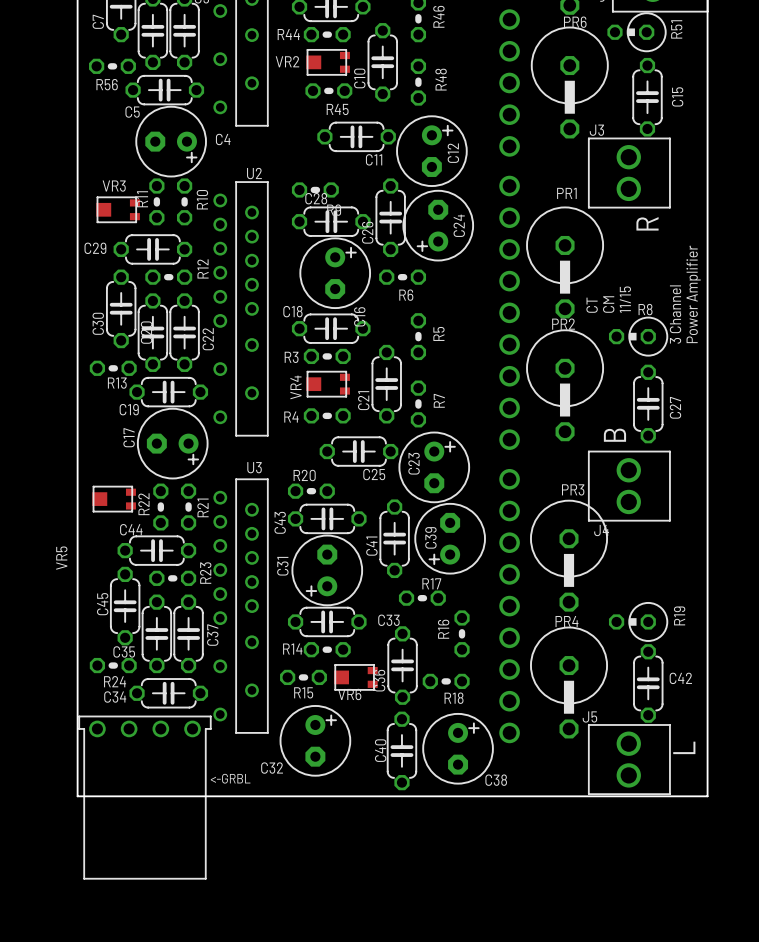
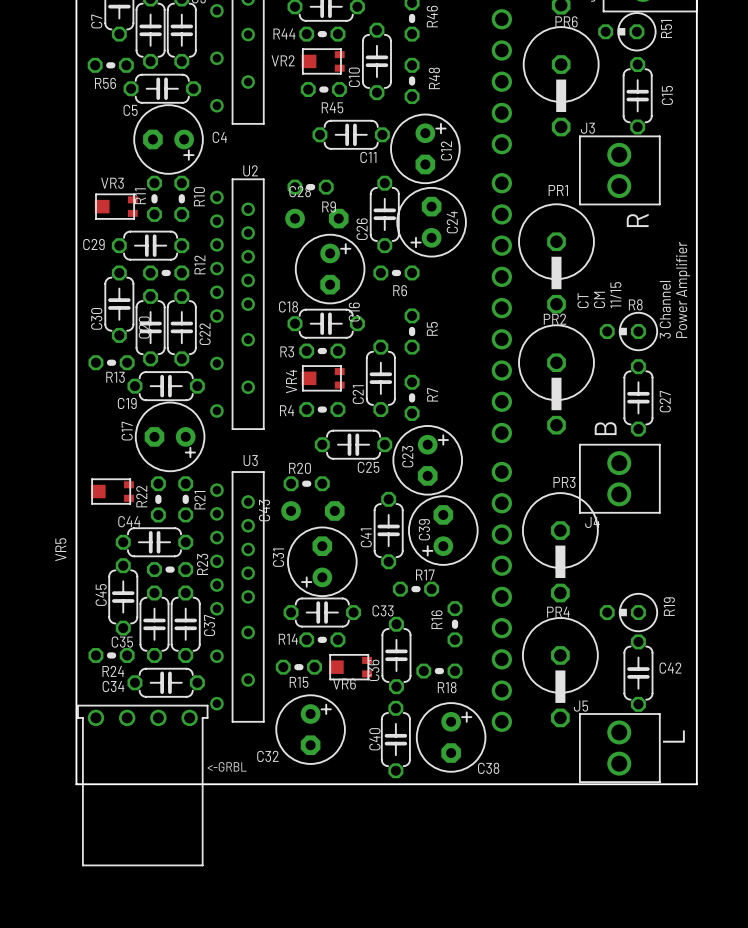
C28 footprint: [291, 206, 371, 237] -> [285, 208, 349, 229]
C43 footprint: [287, 503, 367, 535] -> [281, 501, 345, 521]

